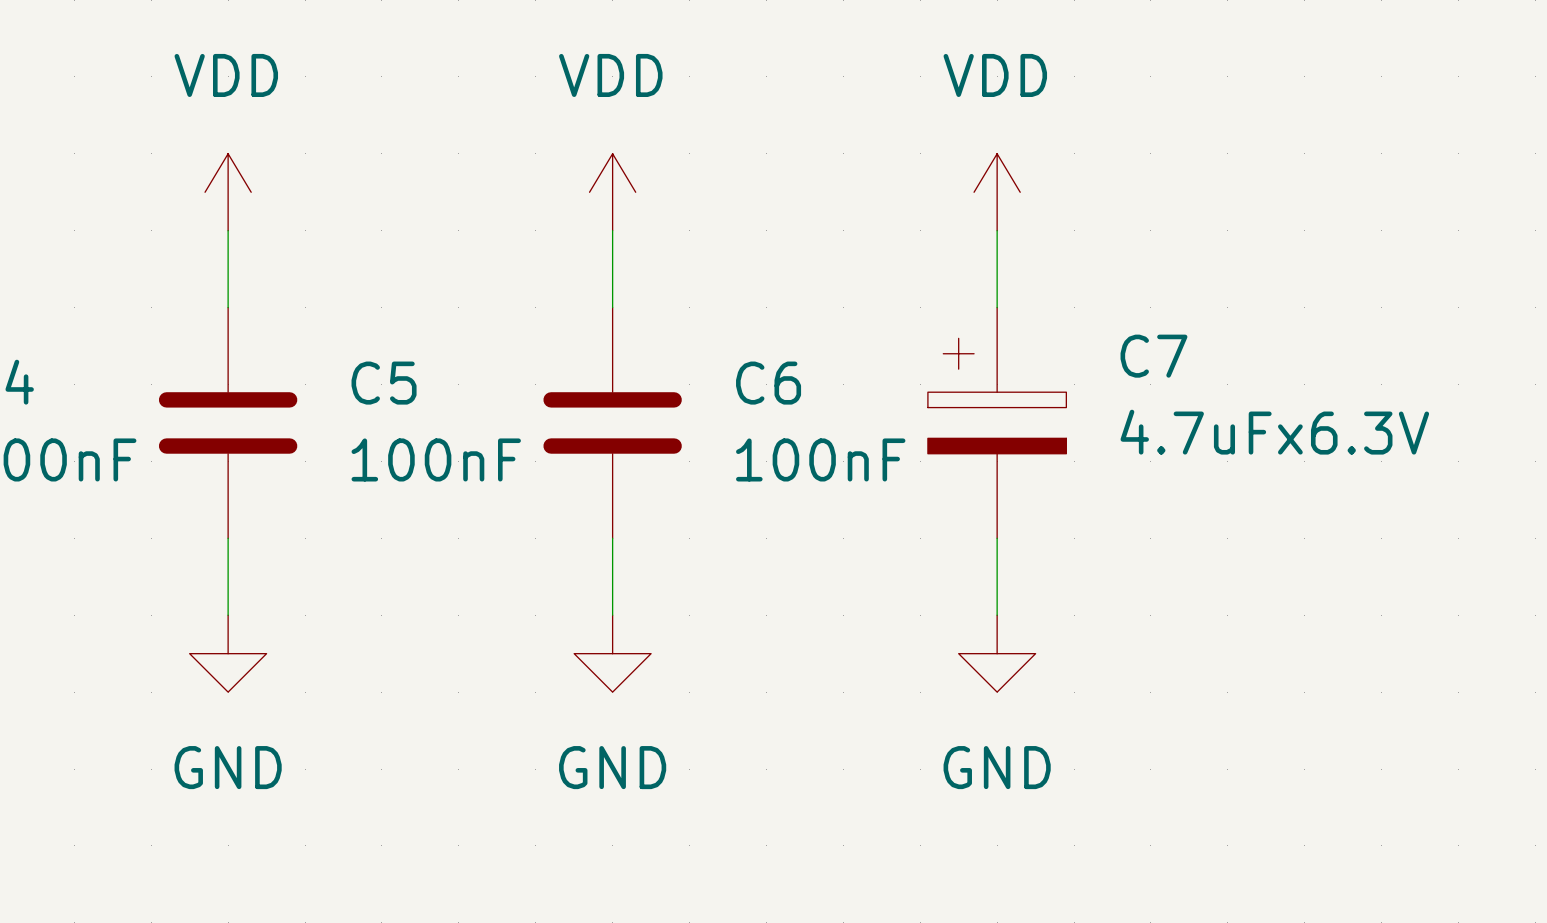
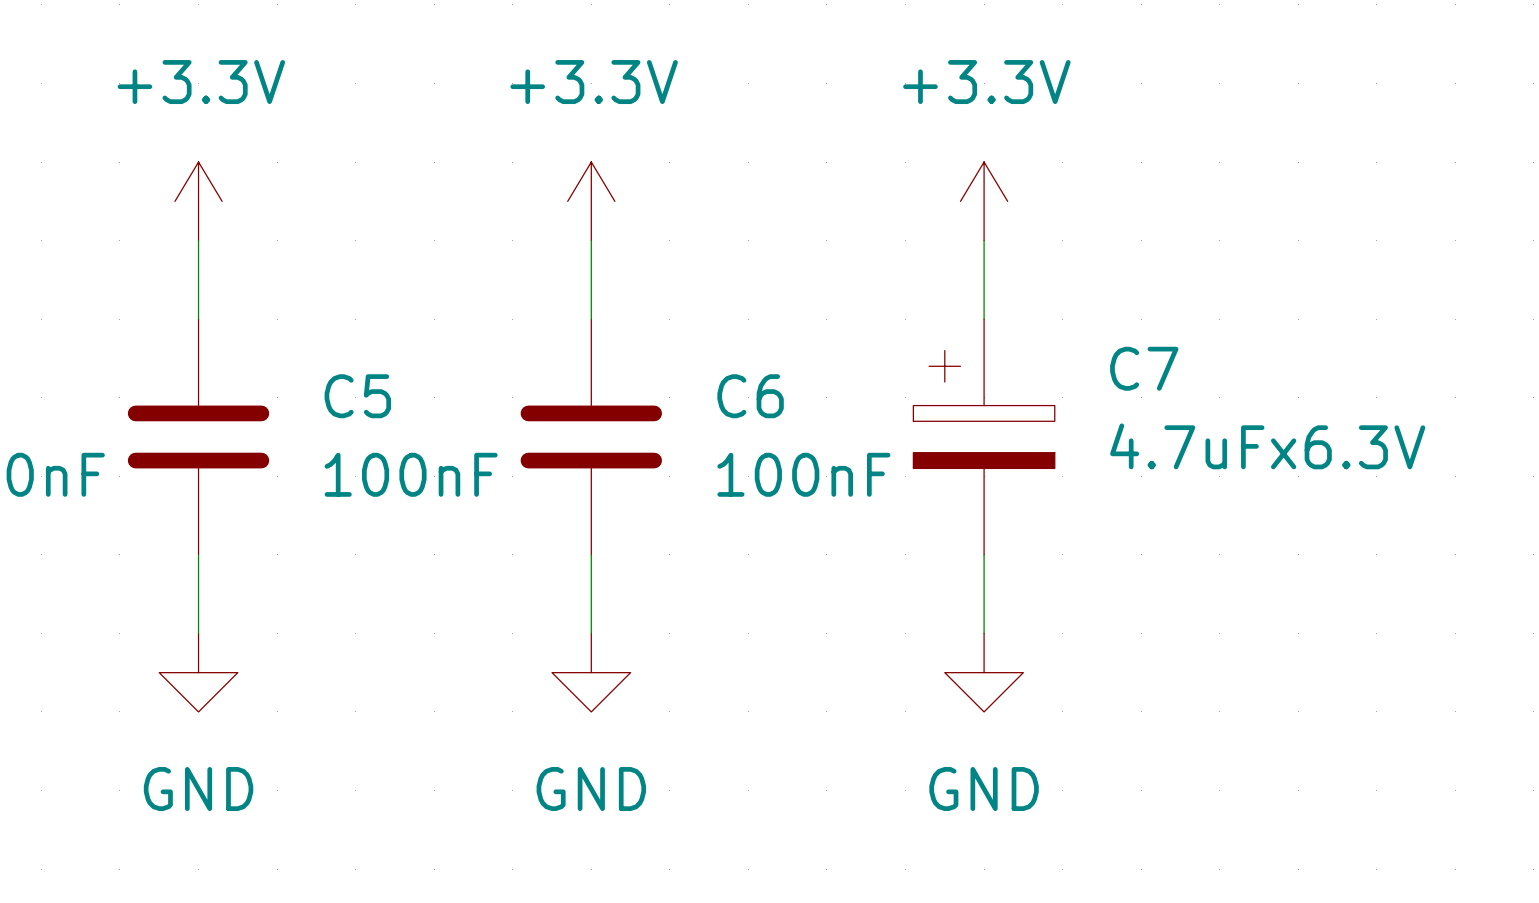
power symbol: VDD (228, 192) -> +3.3V (198, 201)
power symbol: VDD (612, 192) -> +3.3V (591, 201)
power symbol: VDD (997, 192) -> +3.3V (984, 201)

